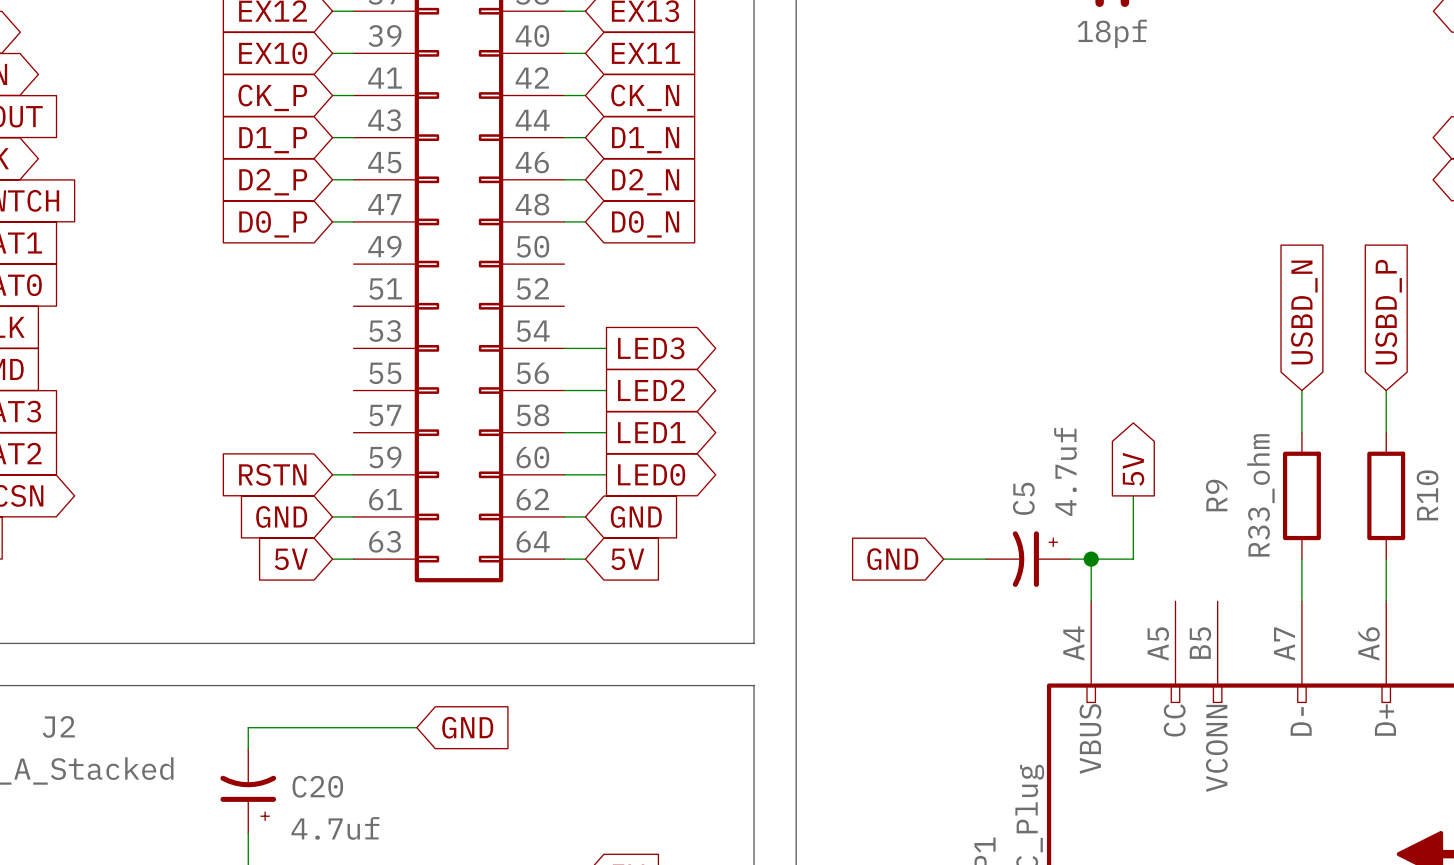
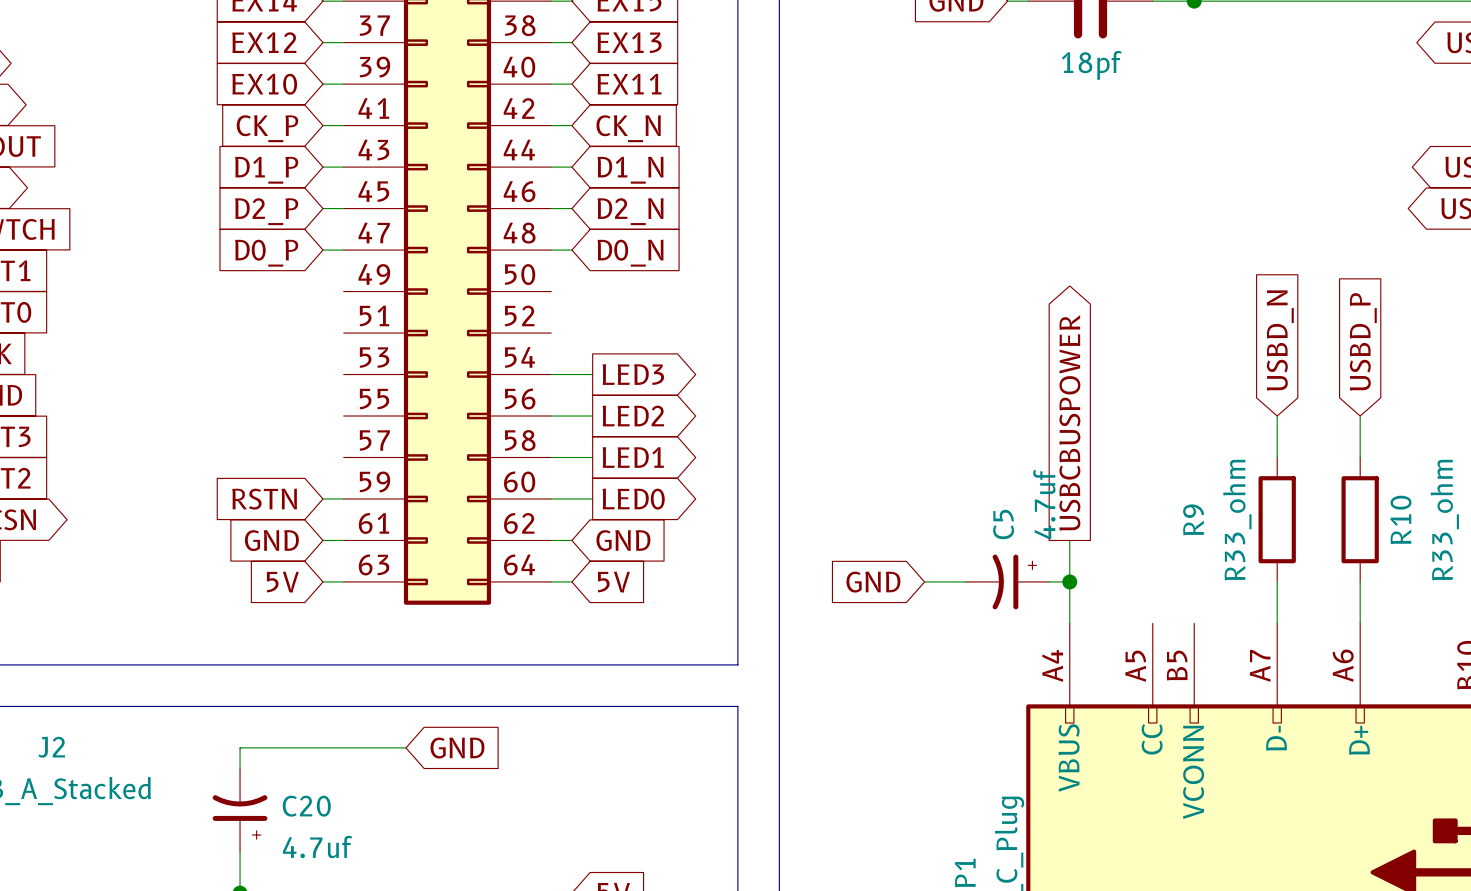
global label: none -> USBCBUSPOWER (1069, 422)
global label: 5V (1133, 469) -> none
wire: (1133, 495) (1133, 559) (1091, 559) -> (1069, 540) (1069, 581)

